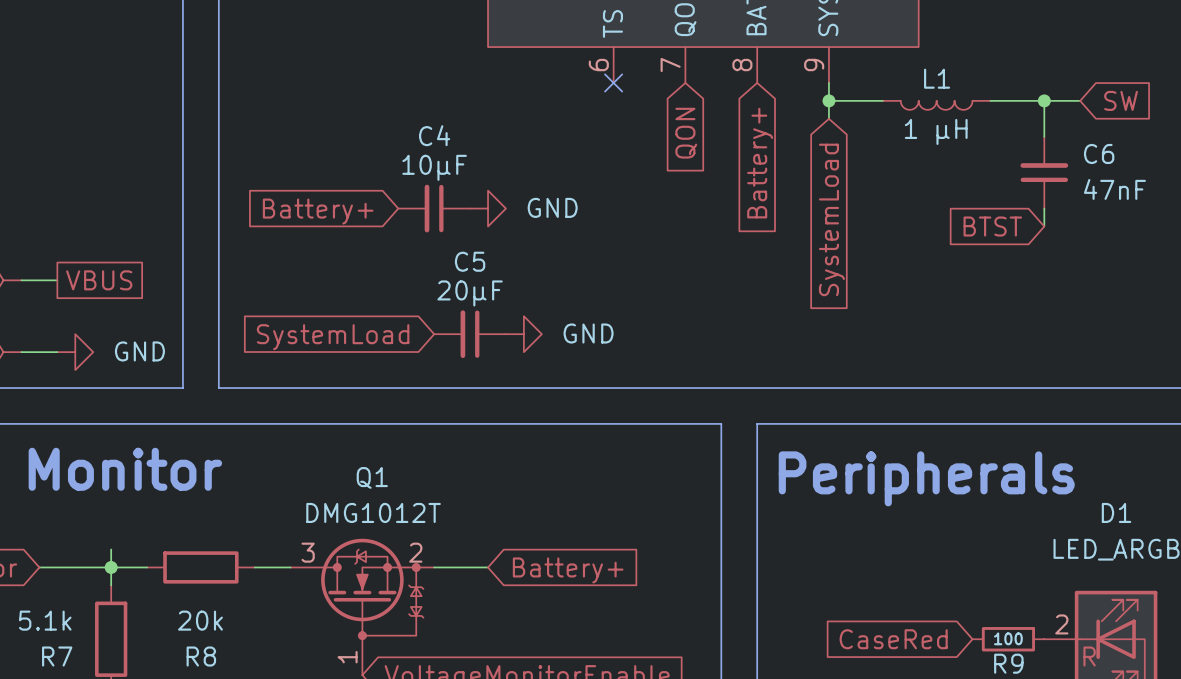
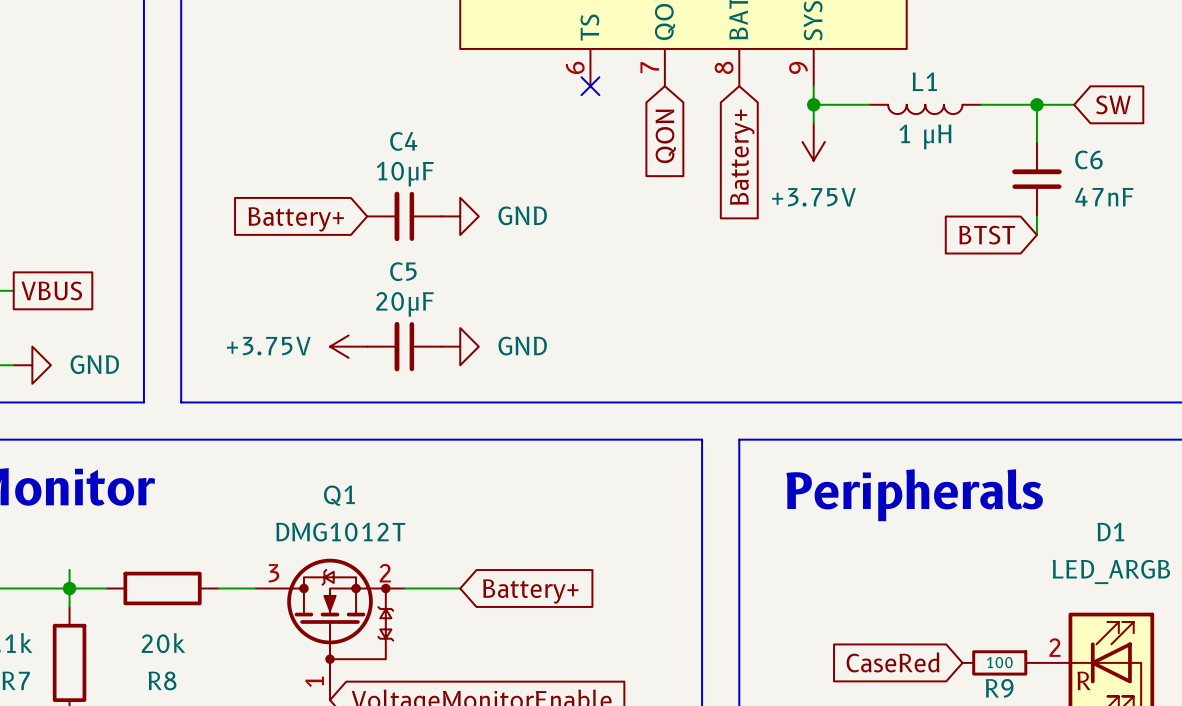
power symbol: none -> +3.75V (813, 142)
global label: SystemLoad (831, 219) -> none
power symbol: none -> +3.75V (348, 346)
C5 position: (470, 334) -> (404, 346)
power symbol position: GND (523, 334) -> GND (460, 346)
global label: SystemLoad (333, 337) -> none

